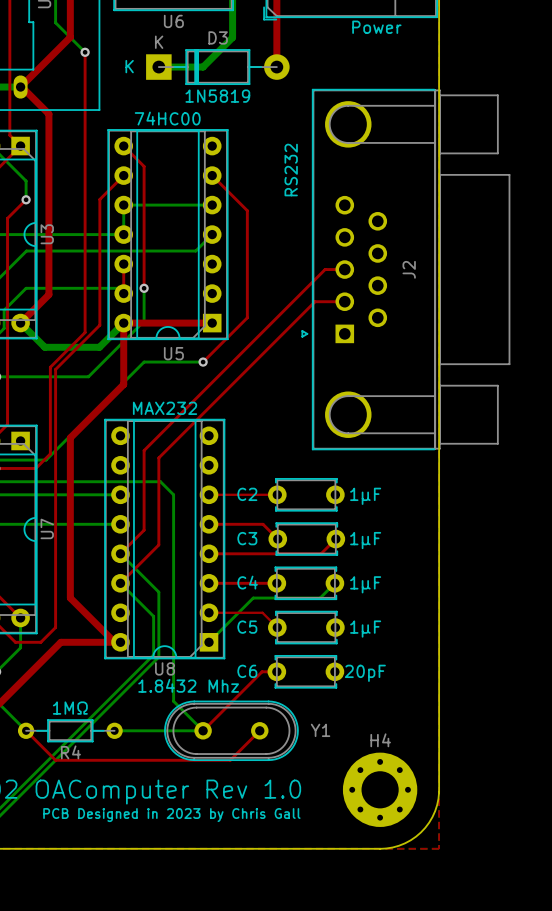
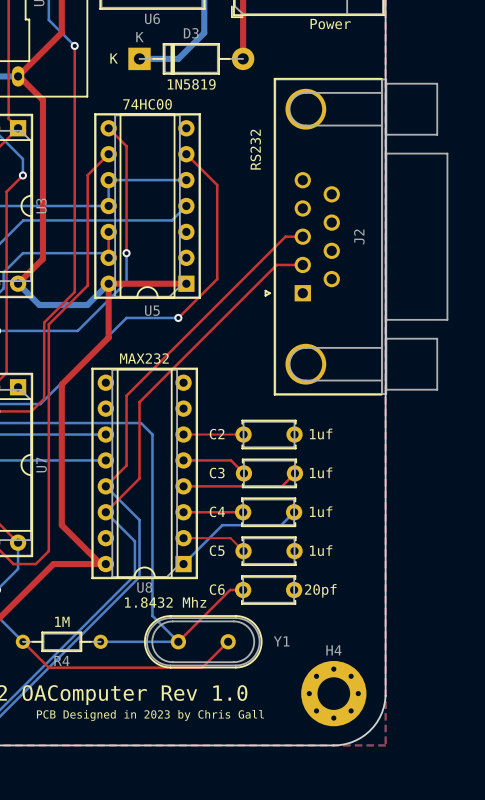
C2 value: 1µF (365, 496) -> 1uf (321, 434)
C3 value: 1µF (365, 540) -> 1uf (321, 472)
C4 value: 1µF (365, 584) -> 1uf (321, 511)
C5 value: 1µF (365, 629) -> 1uf (321, 550)
C6 value: 20pF (365, 673) -> 20pf (320, 590)
R4 value: 1MΩ (70, 708) -> 1M (62, 621)

